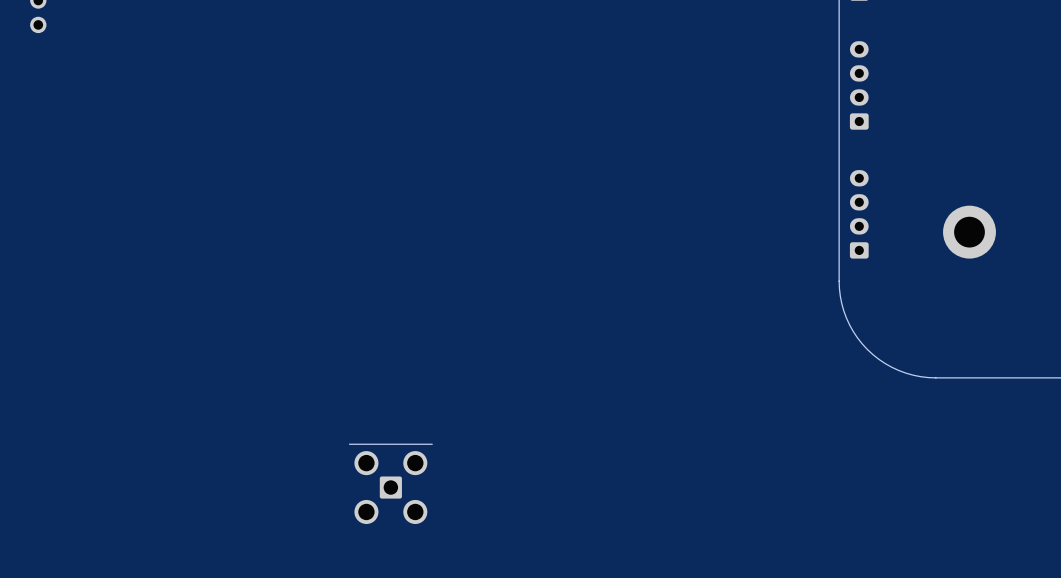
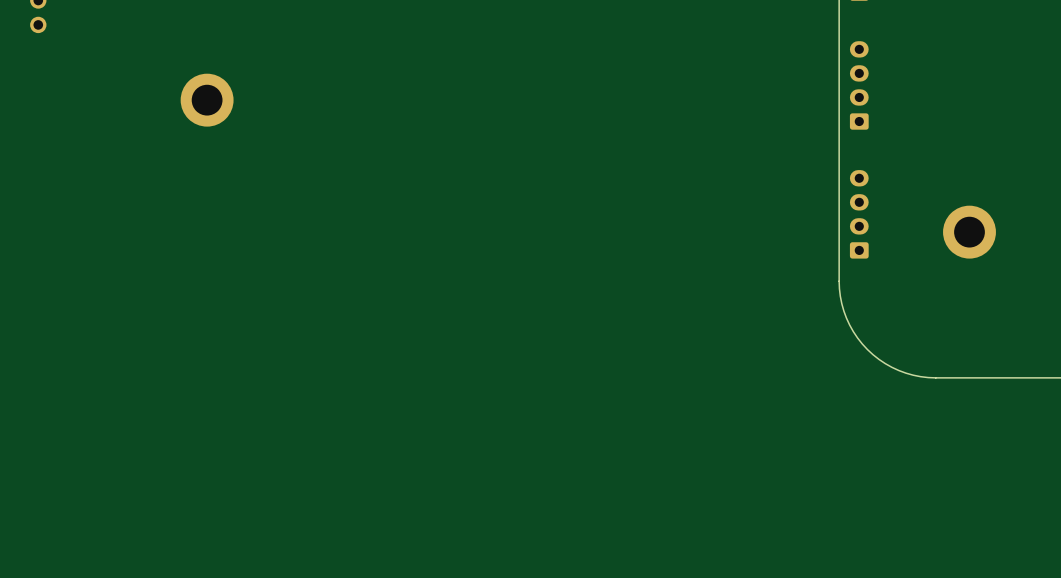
part: none -> (207, 100)
part: (390, 483) -> none

